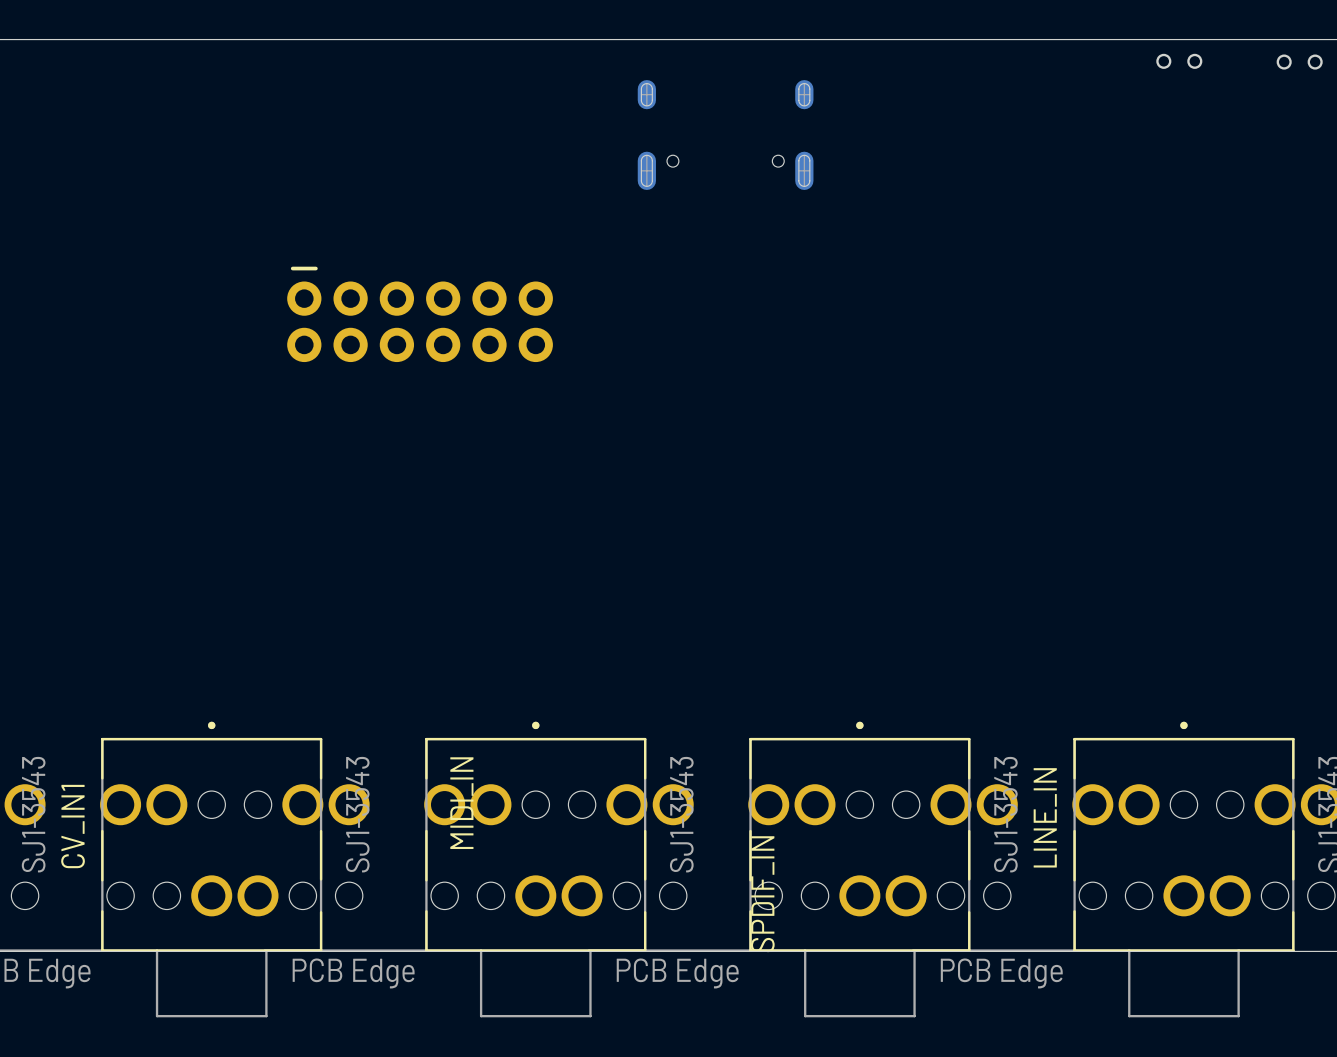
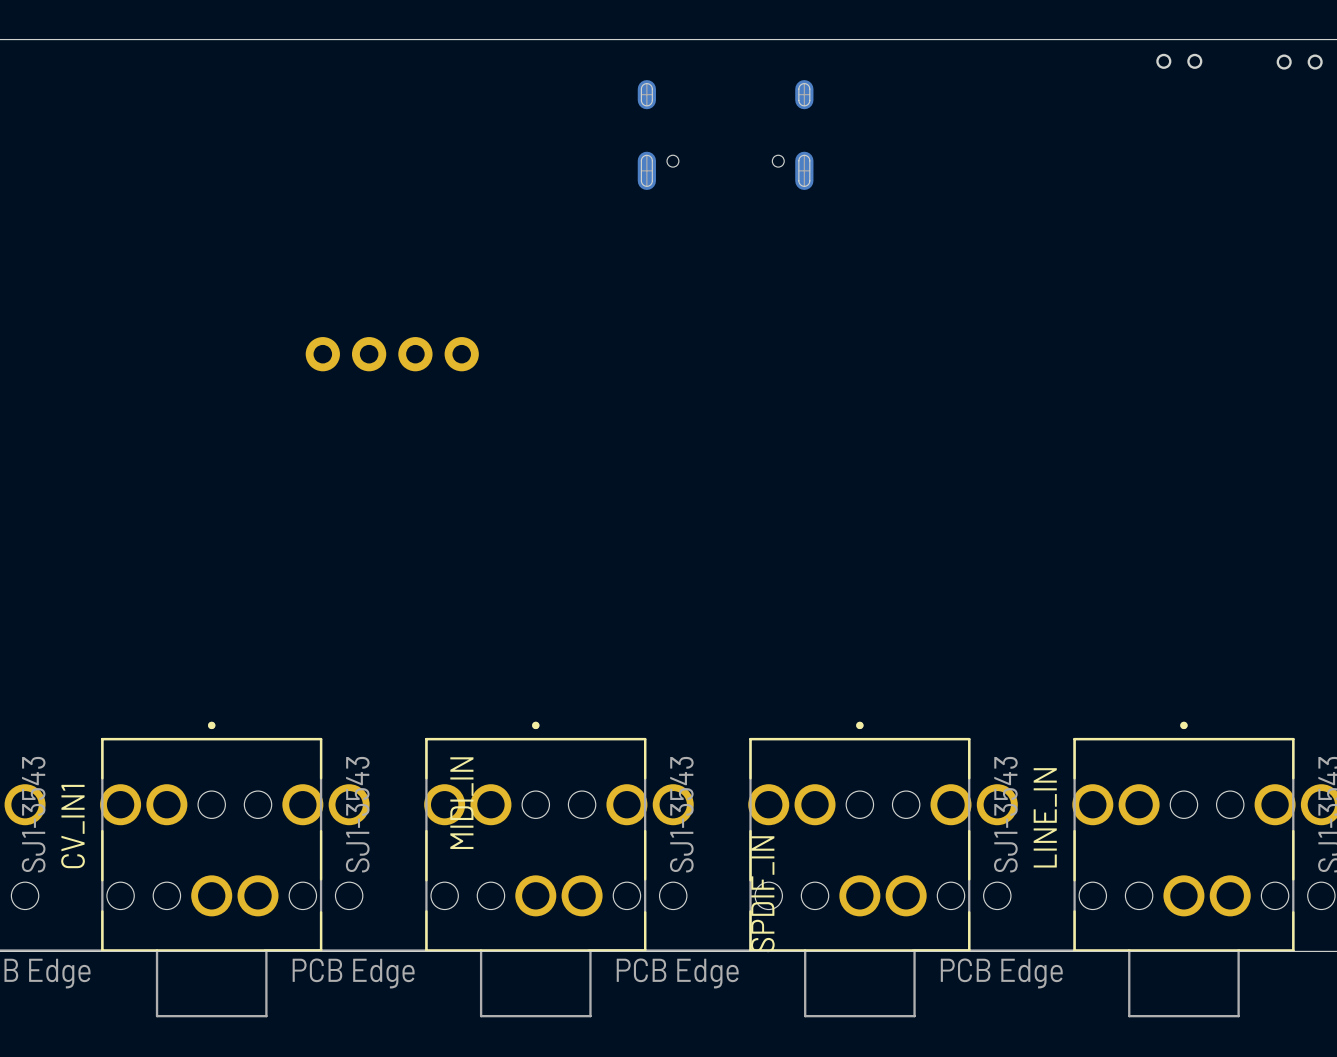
part: (420, 314) -> none
part: none -> (392, 354)

